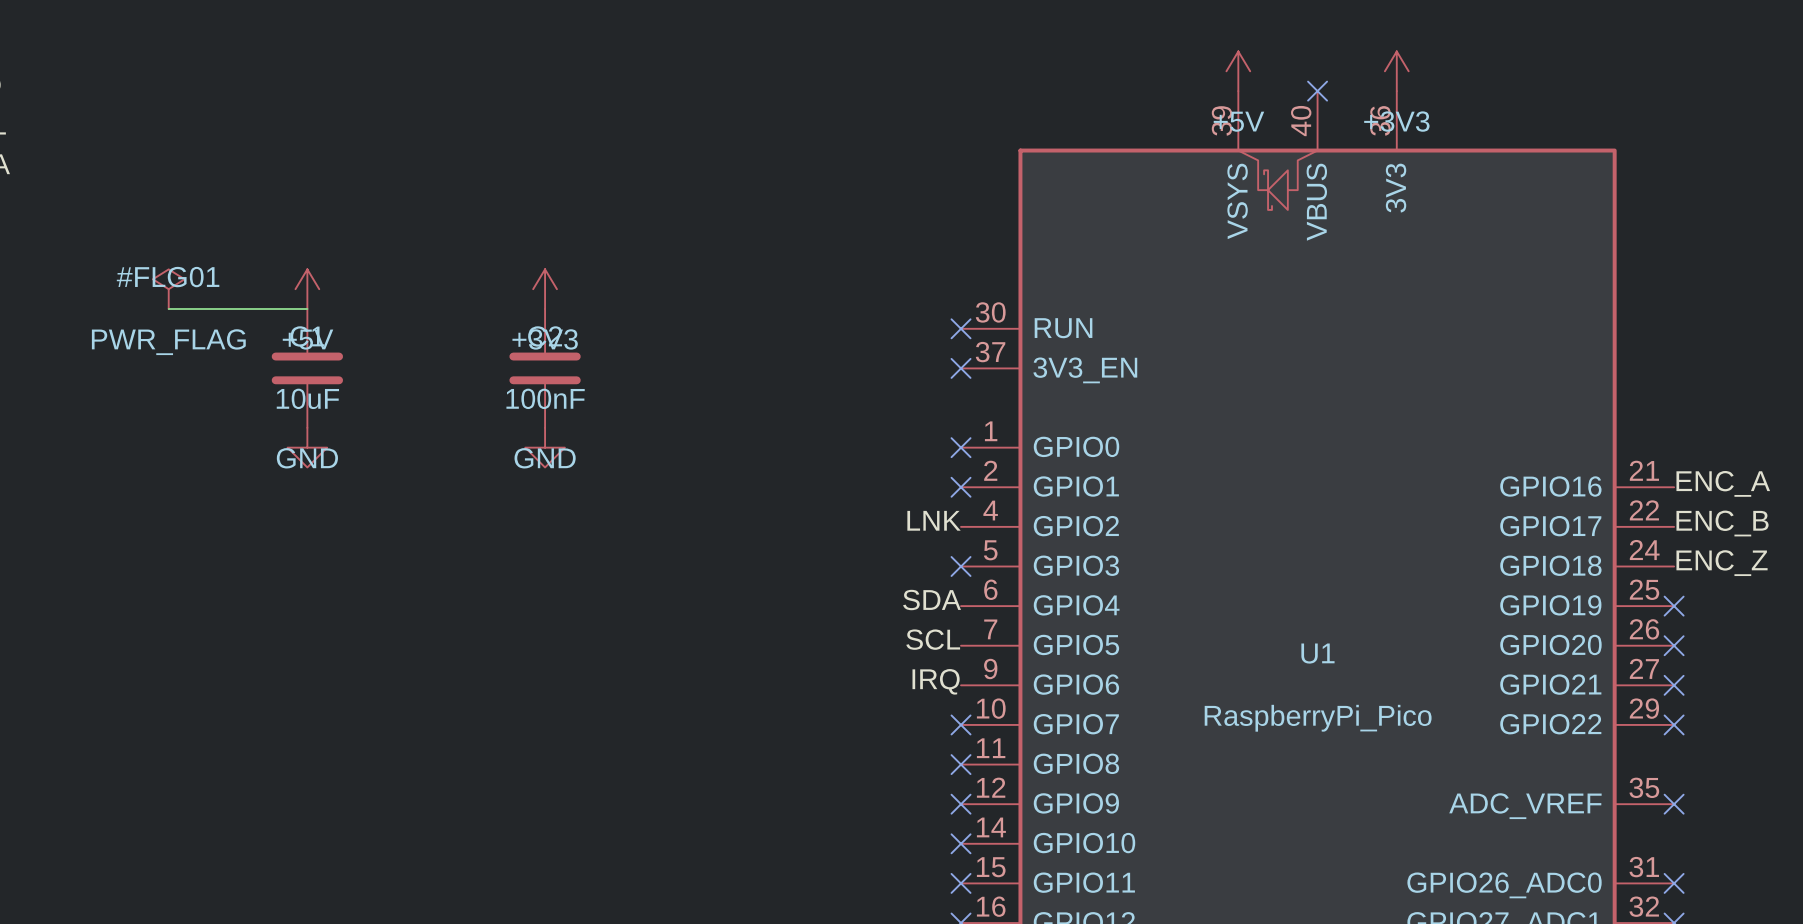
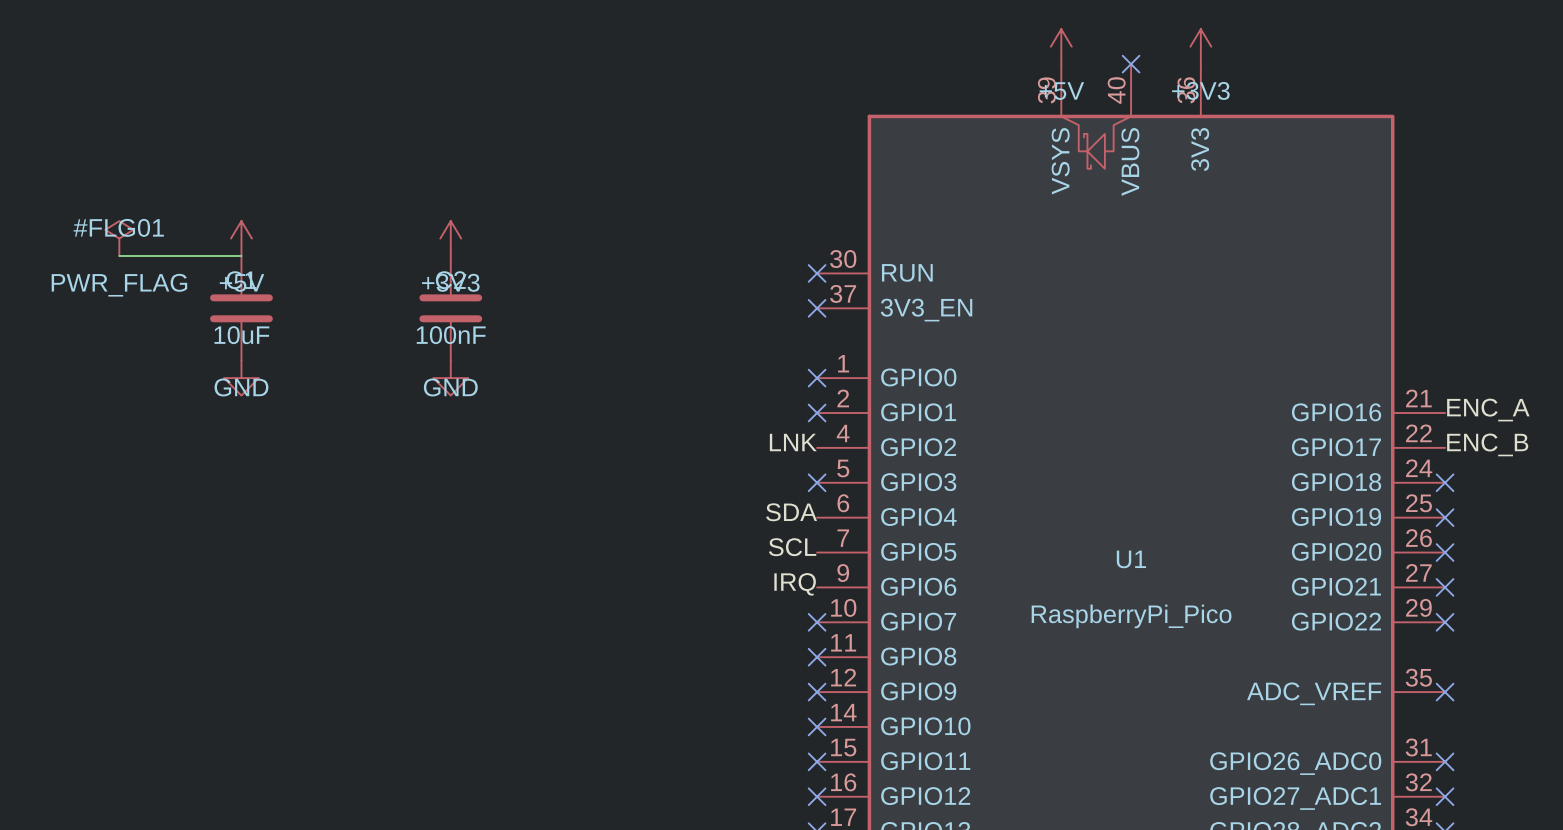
label: ENC_Z (1722, 563) -> none
no-connect mark: none -> (1445, 482)

